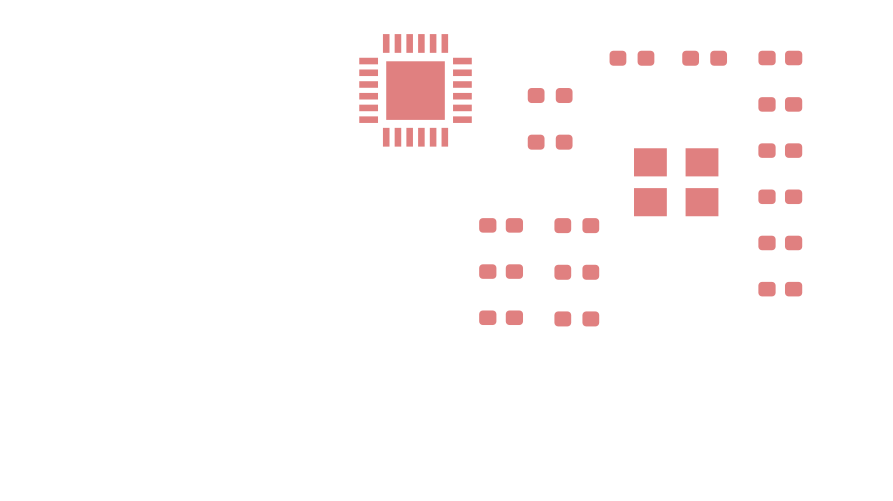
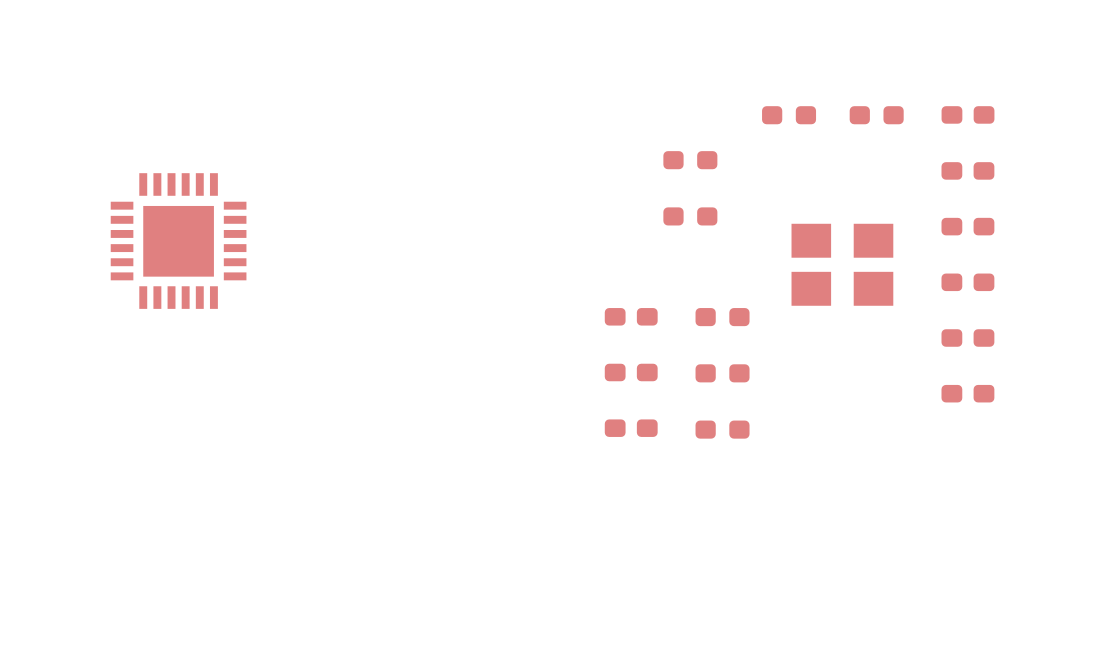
part position: (415, 90) -> (178, 241)

